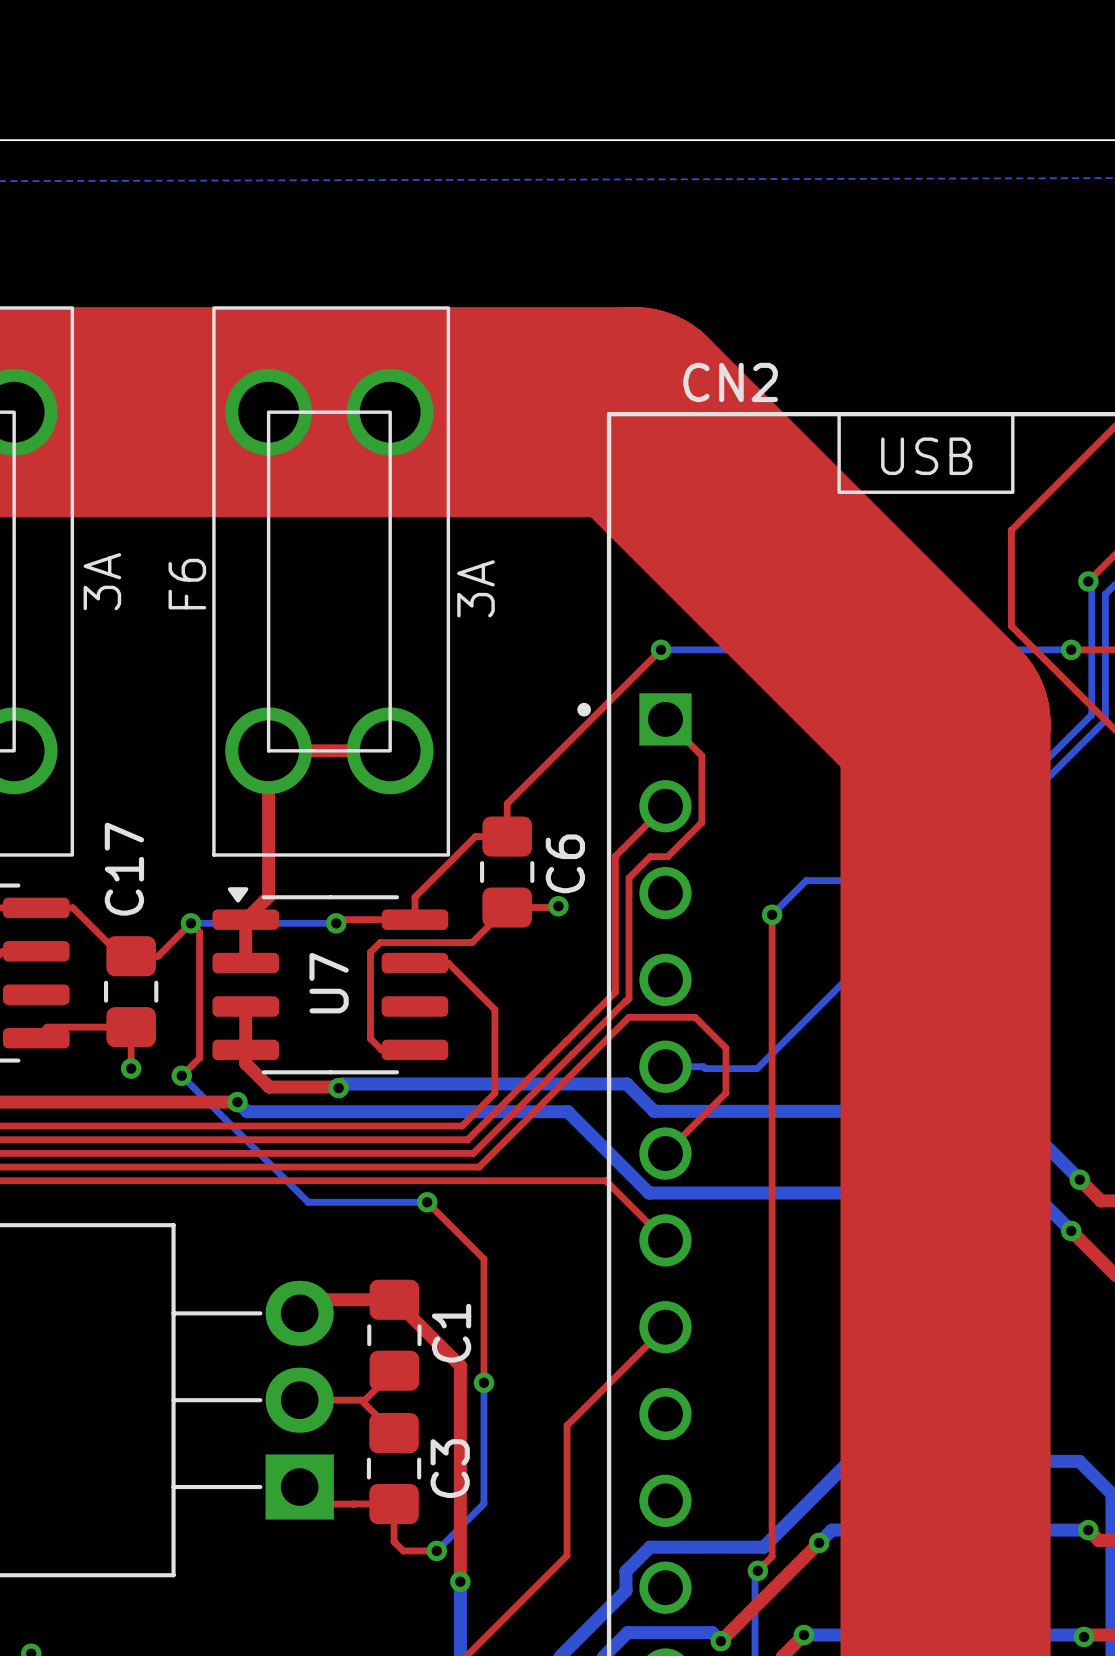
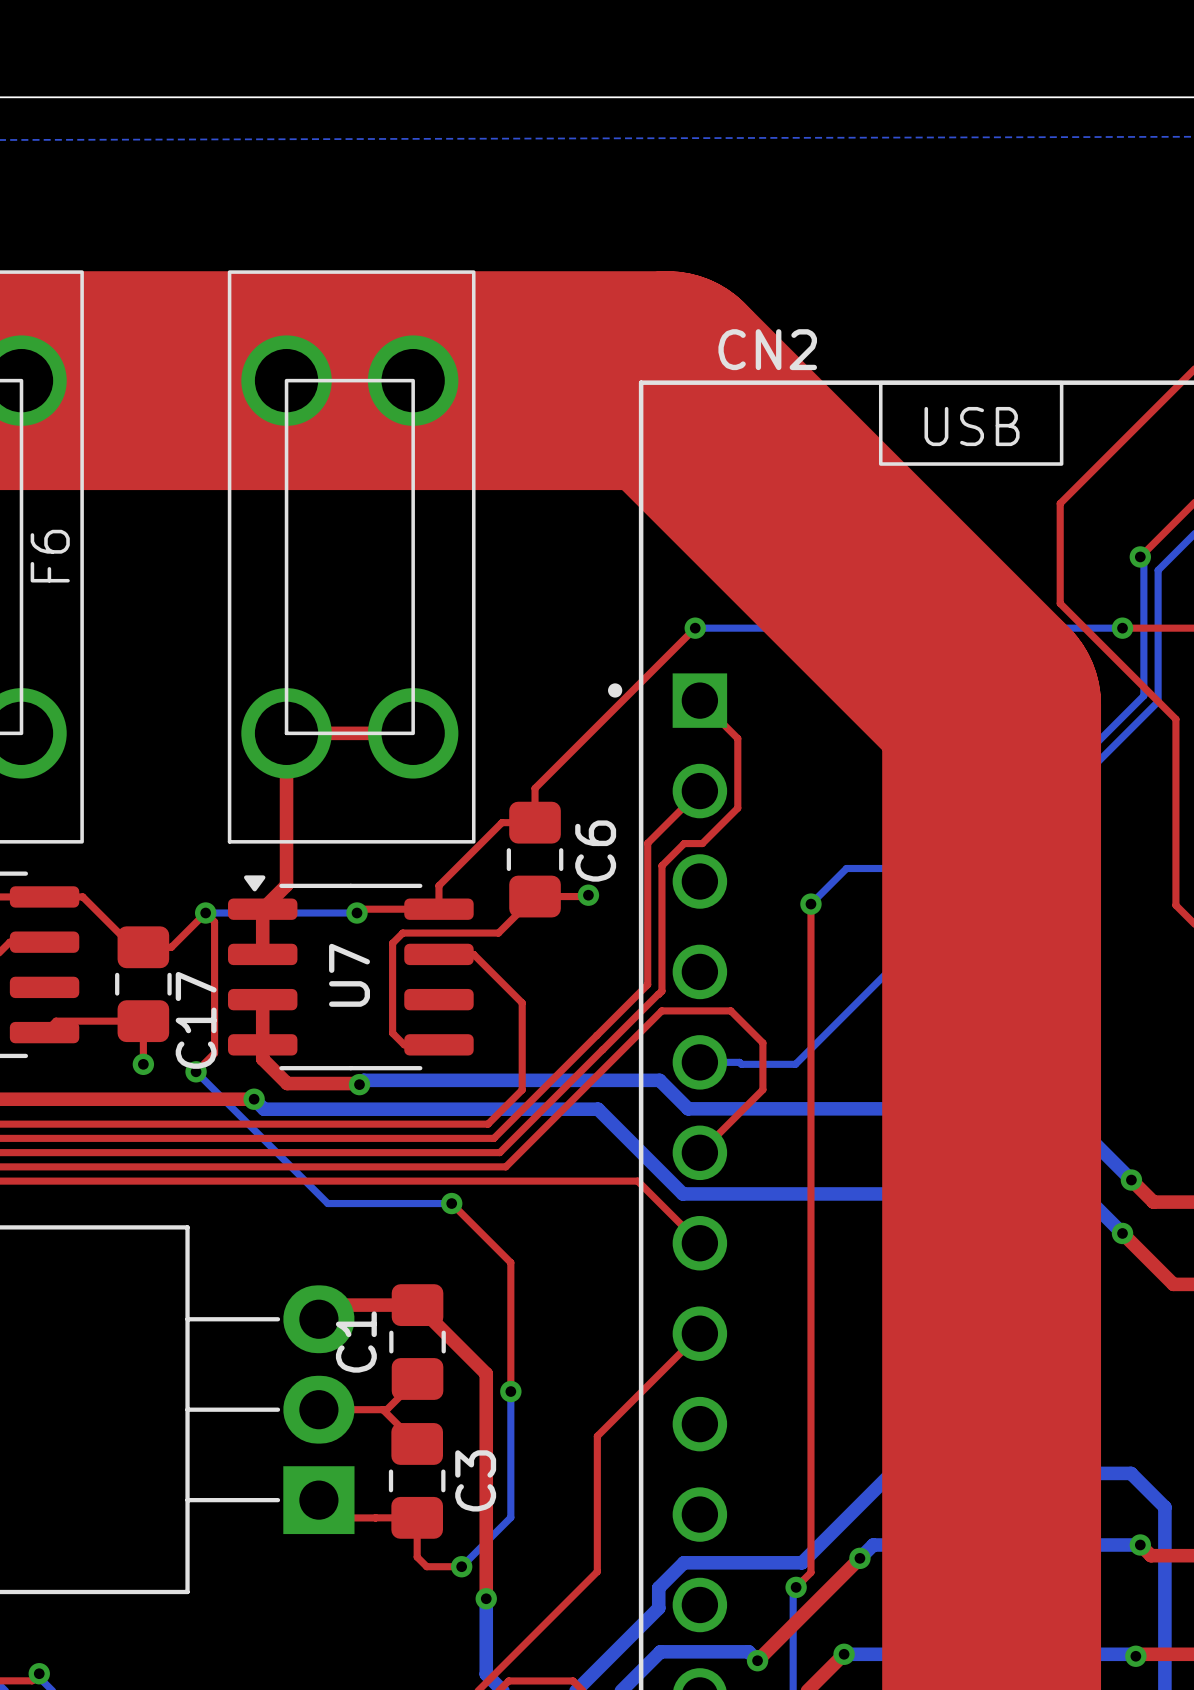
text: 3A (102, 581) -> none
F6 name position: F6 (187, 584) -> F6 (50, 556)
text: 3A (476, 588) -> none
C17 name position: C17 (124, 869) -> C17 (196, 1020)
C1 name position: C1 (451, 1333) -> C1 (356, 1342)

